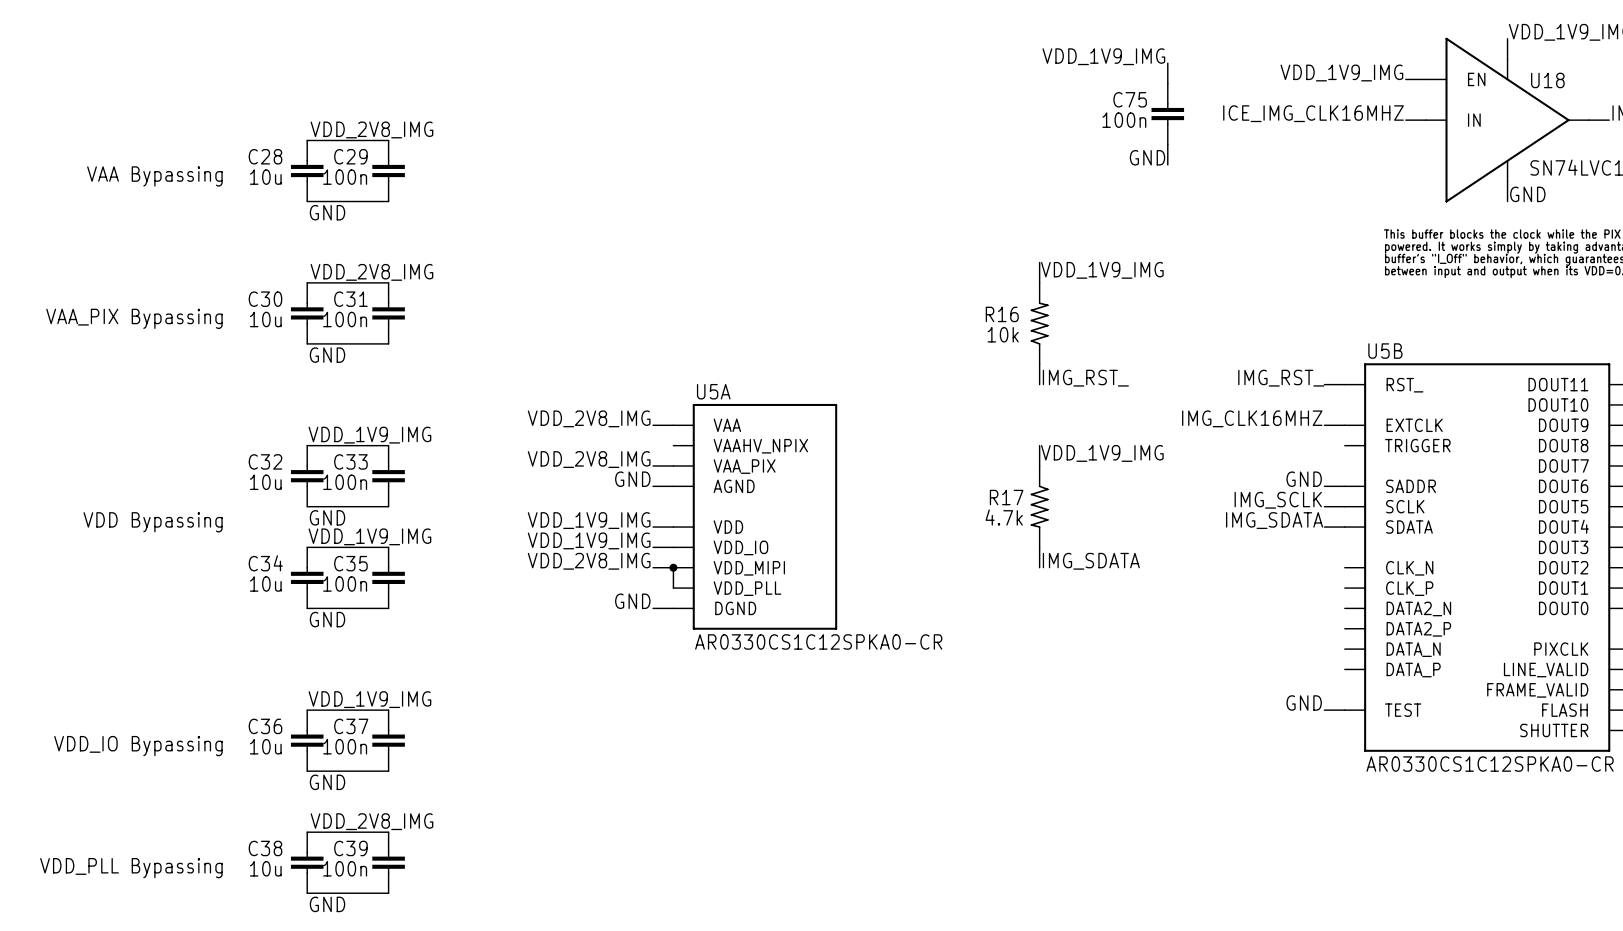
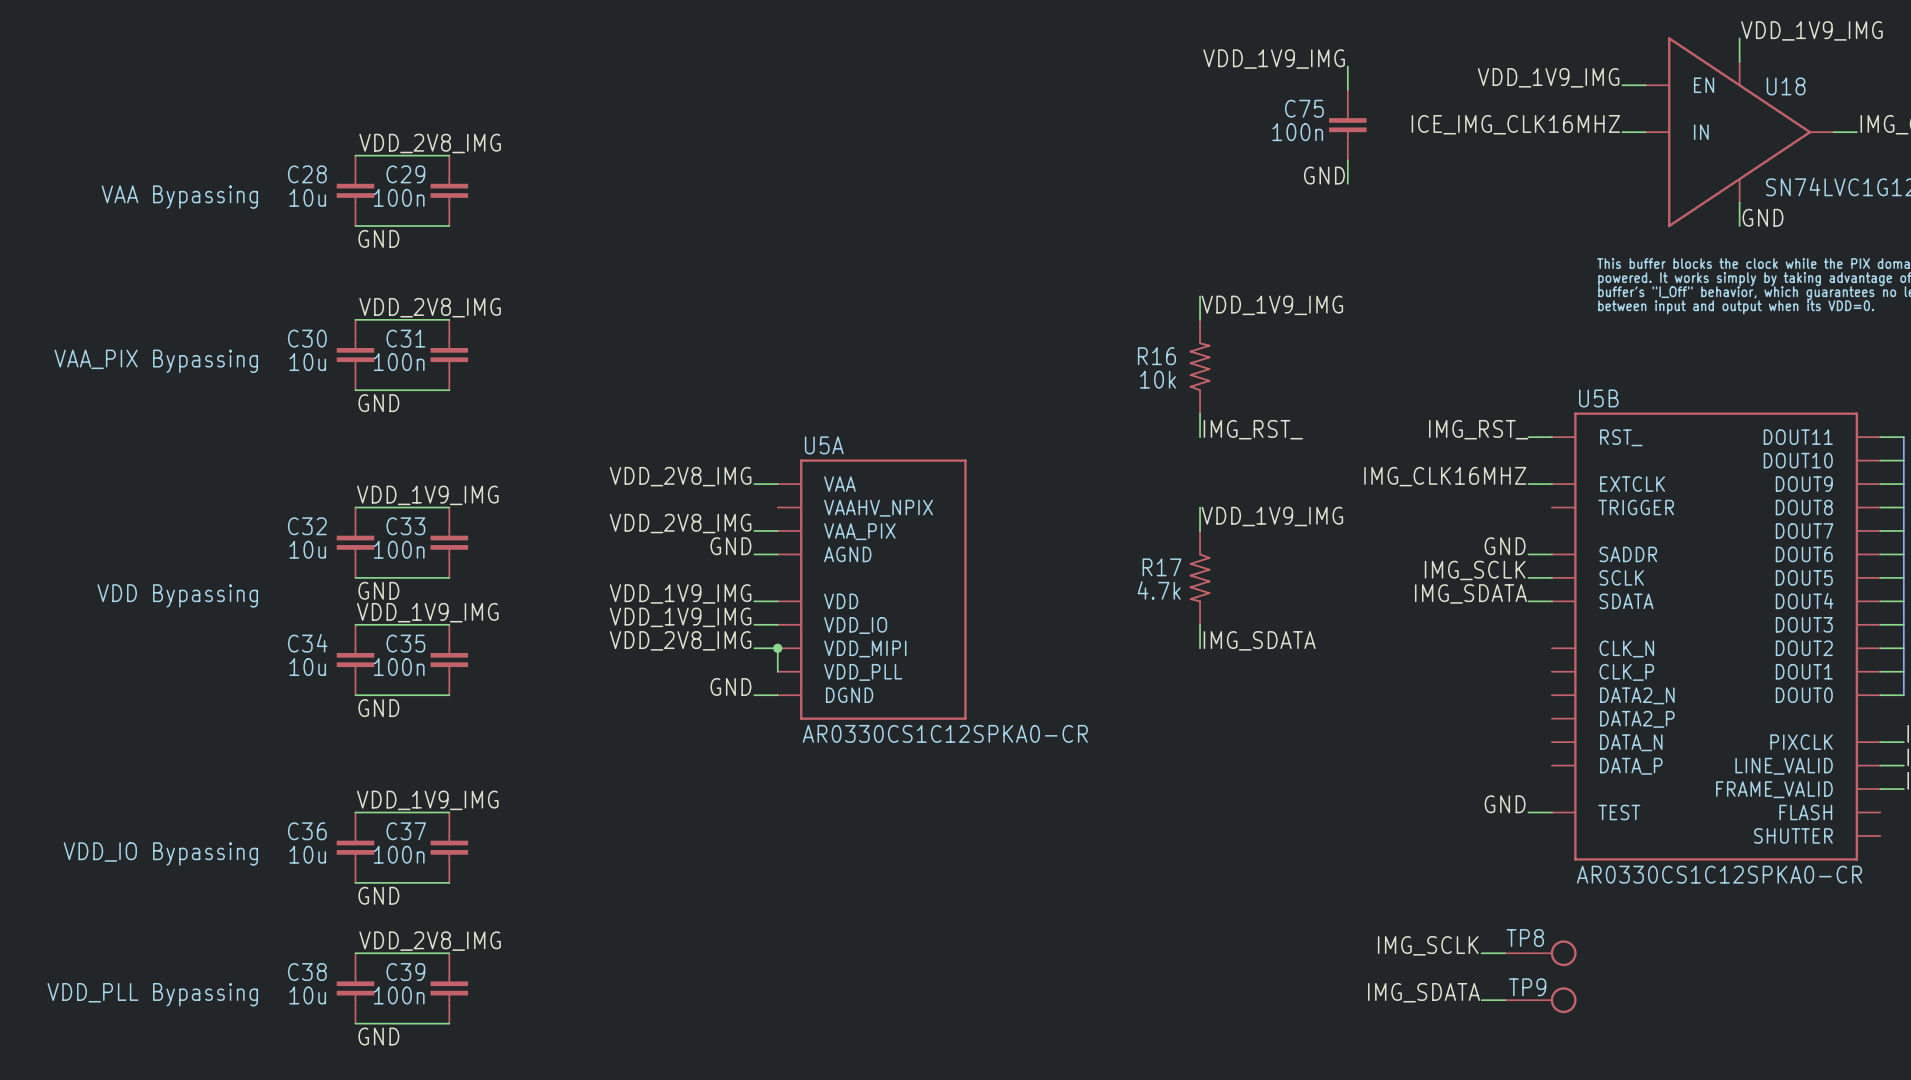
label: none -> IMG_SCLK (1428, 945)
wire: none -> (1481, 953) (1505, 953)
TP8: none -> (1540, 953)
label: none -> IMG_SDATA (1424, 992)
wire: none -> (1481, 1000) (1505, 1000)
TP9: none -> (1540, 1000)

